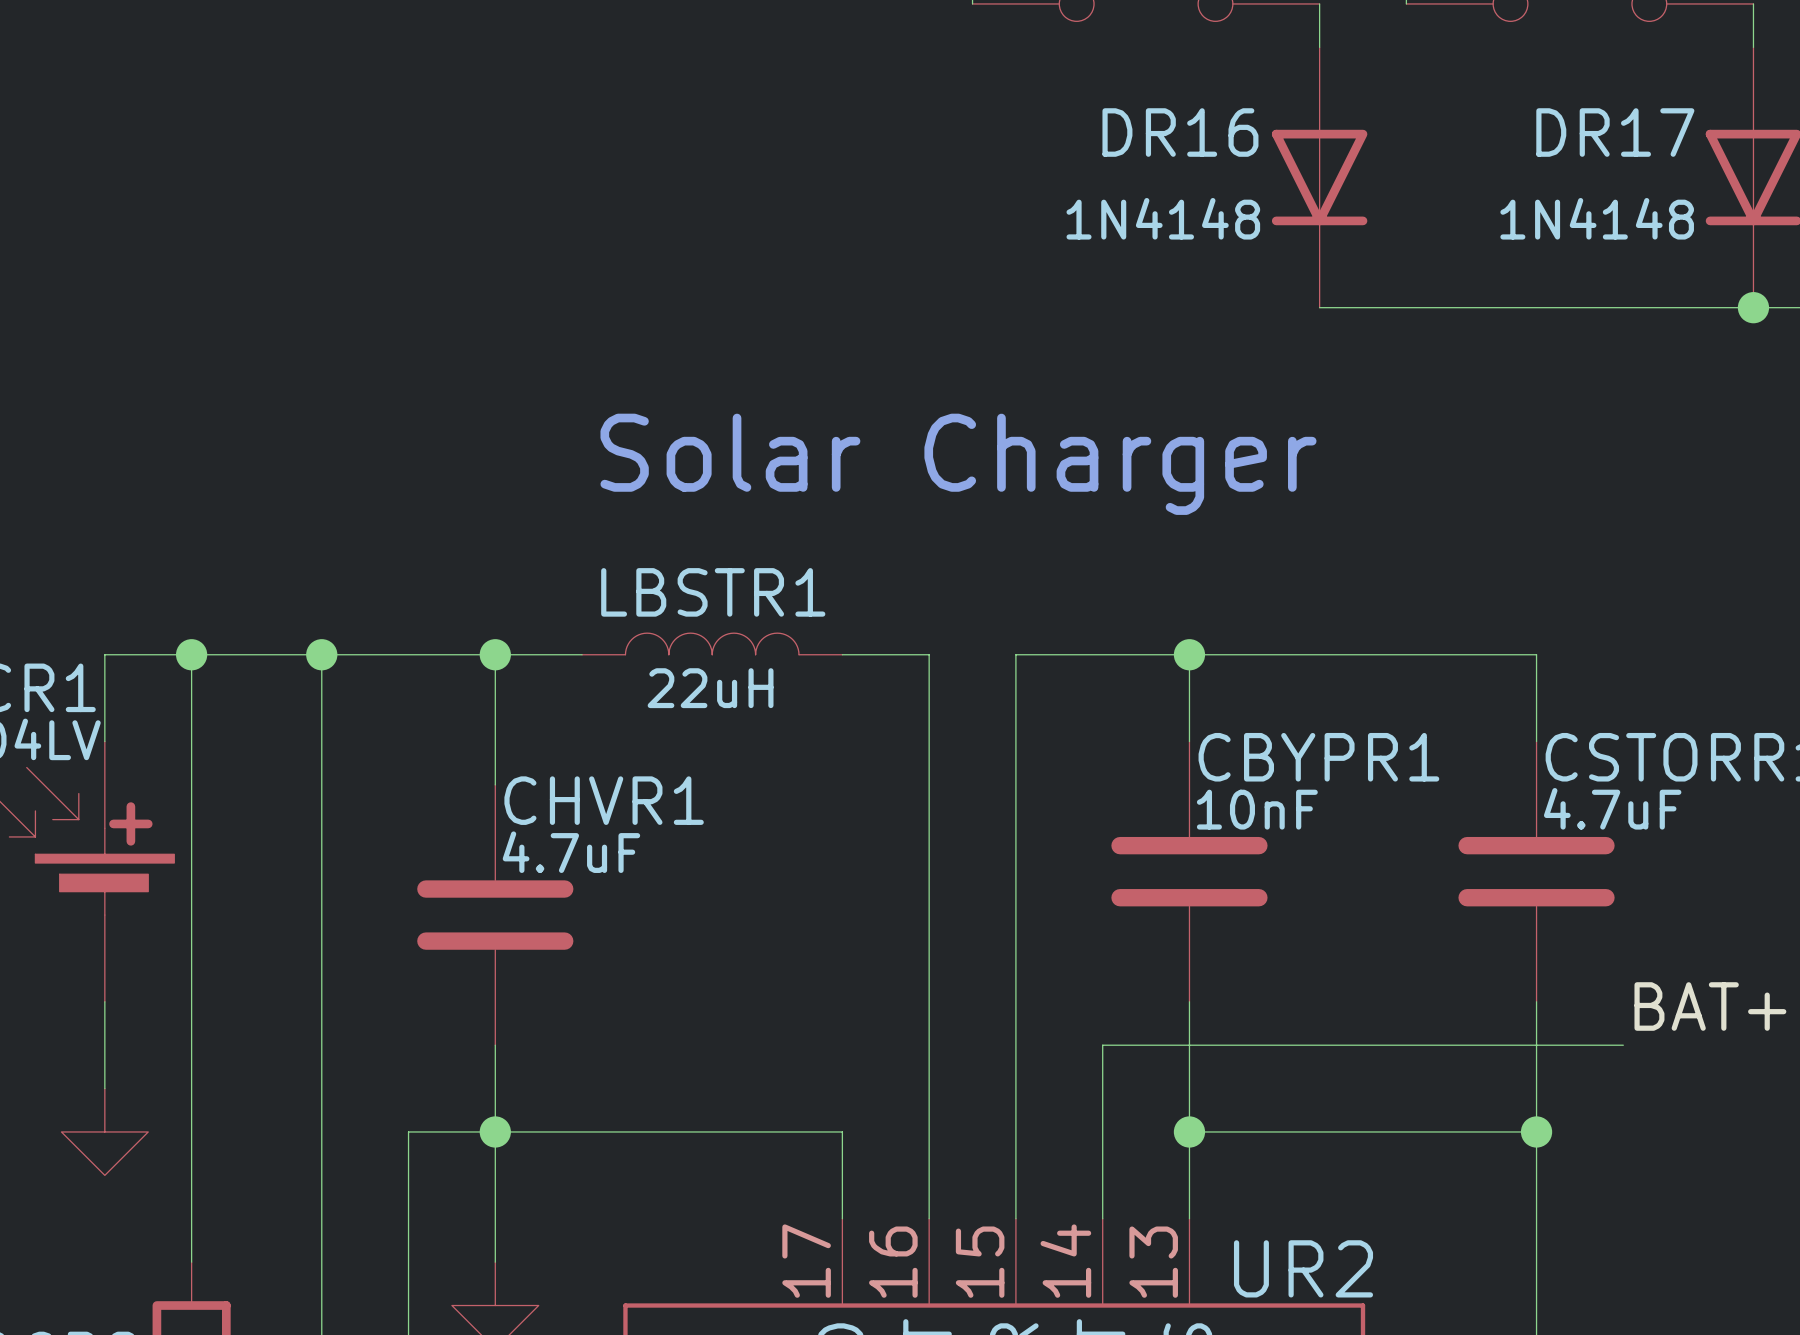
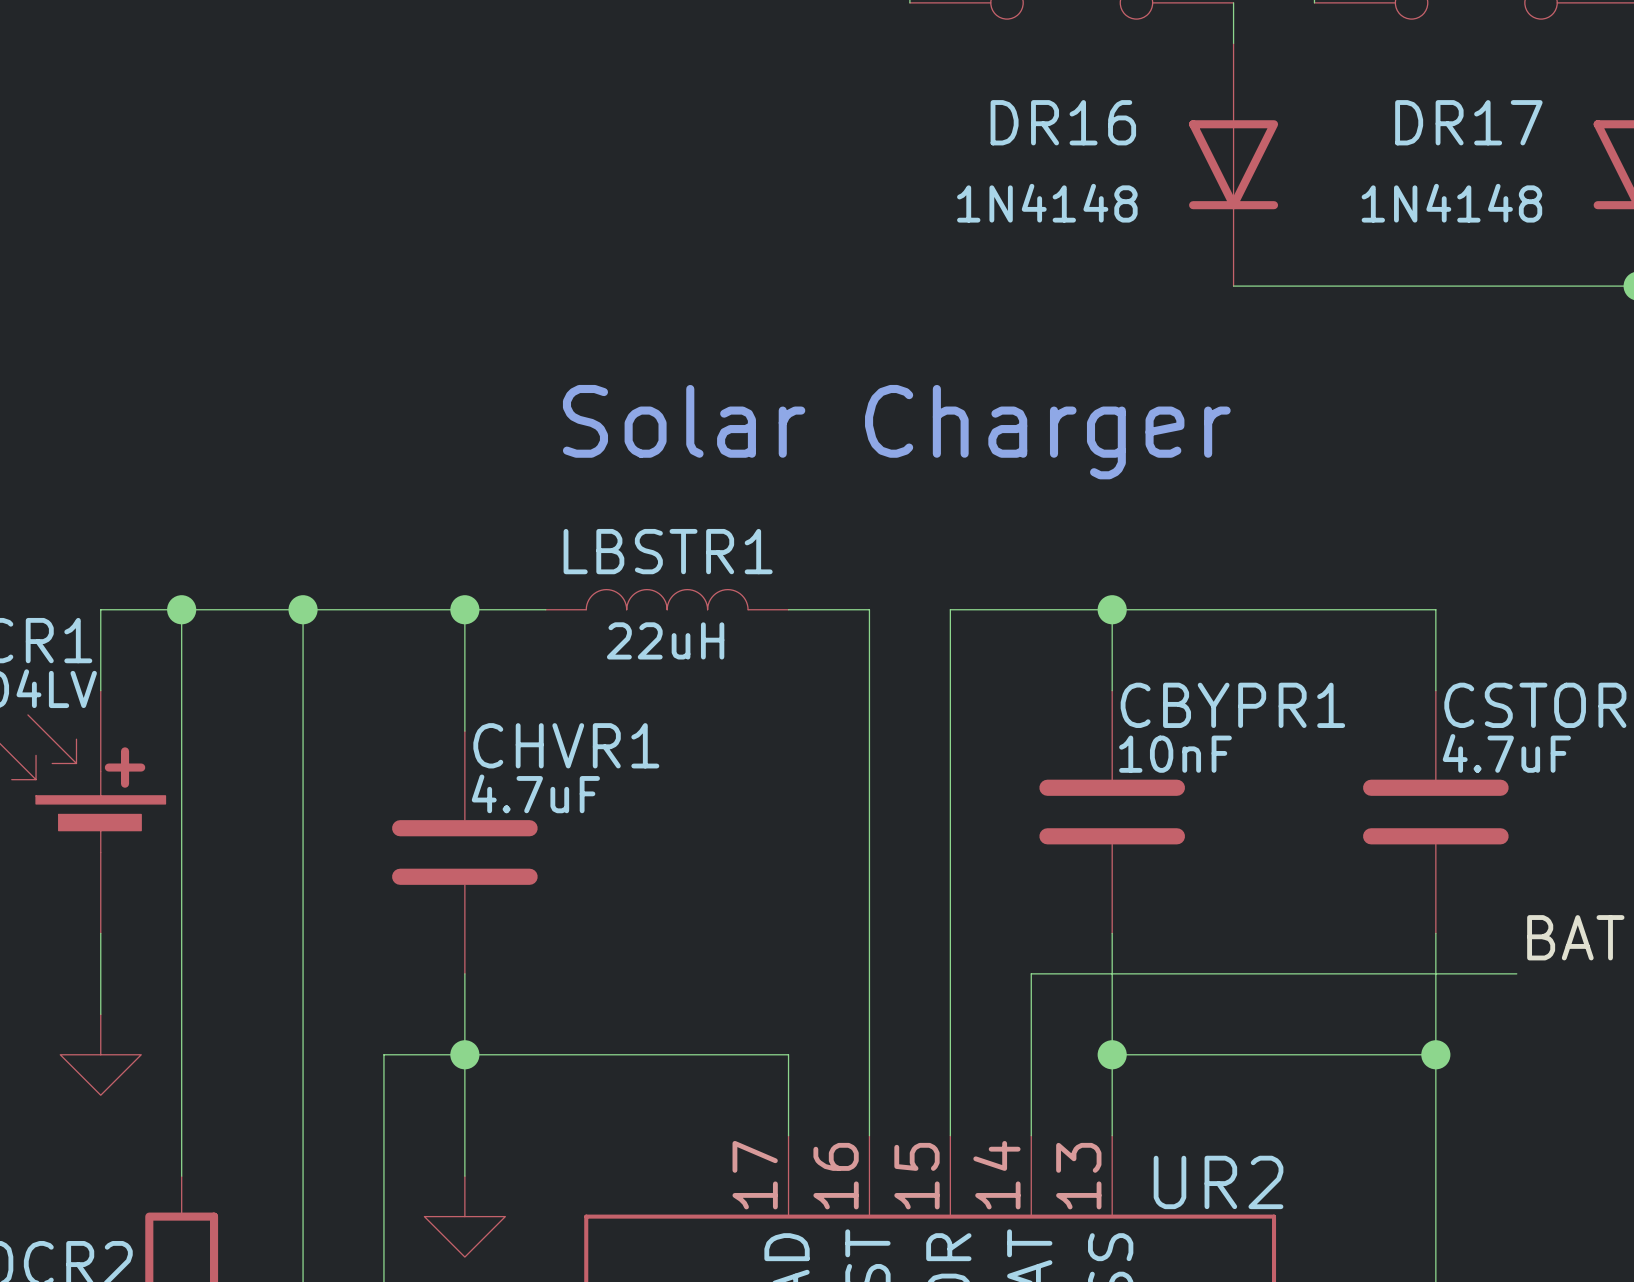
DR16 name position: DR16 (1180, 132) -> DR16 (1063, 122)
DR17 name position: DR17 (1615, 132) -> DR17 (1468, 122)
DR16 value position: 1N4148 (1163, 218) -> 1N4148 (1047, 203)
DR17 value position: 1N4148 (1597, 218) -> 1N4148 (1451, 203)

